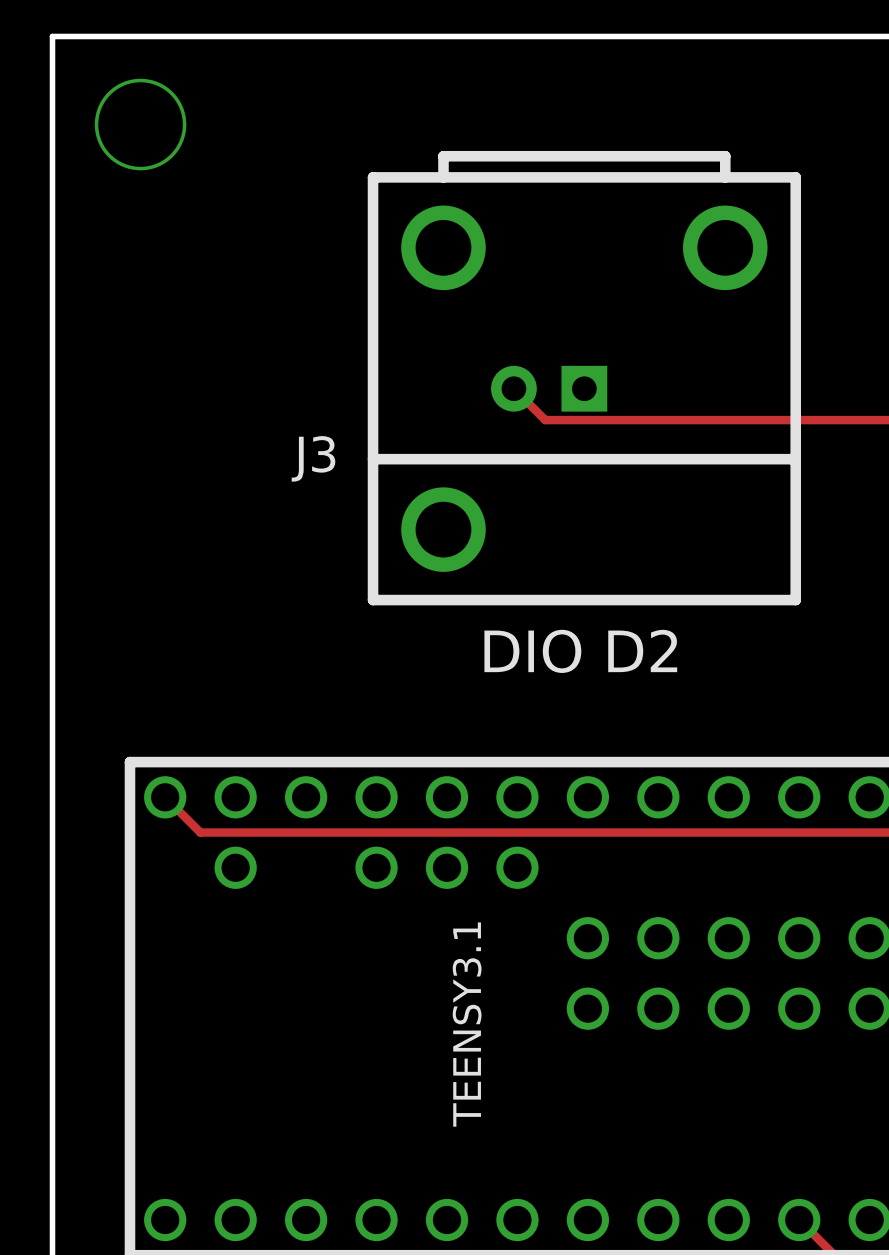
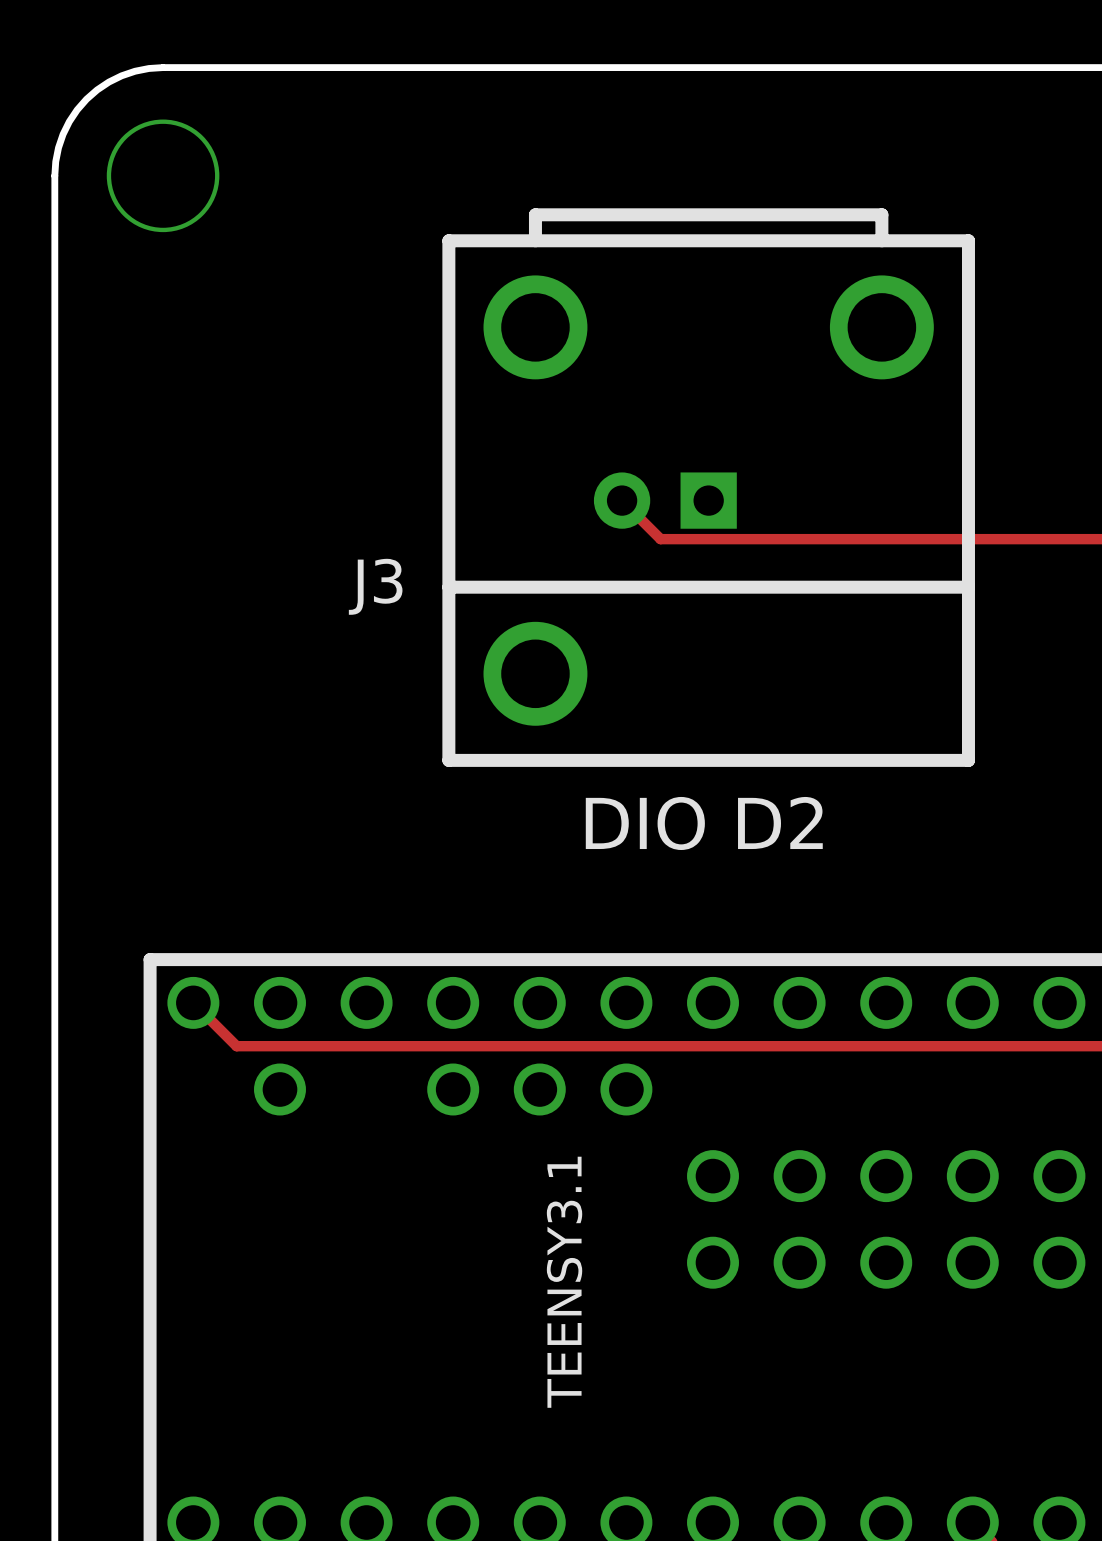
board edge: (140, 36) (52, 36) (52, 124) -> (163, 67) (135, 71) (121, 75) (97, 89) (86, 99) (77, 109) (63, 134) (58, 147) (54, 175)

